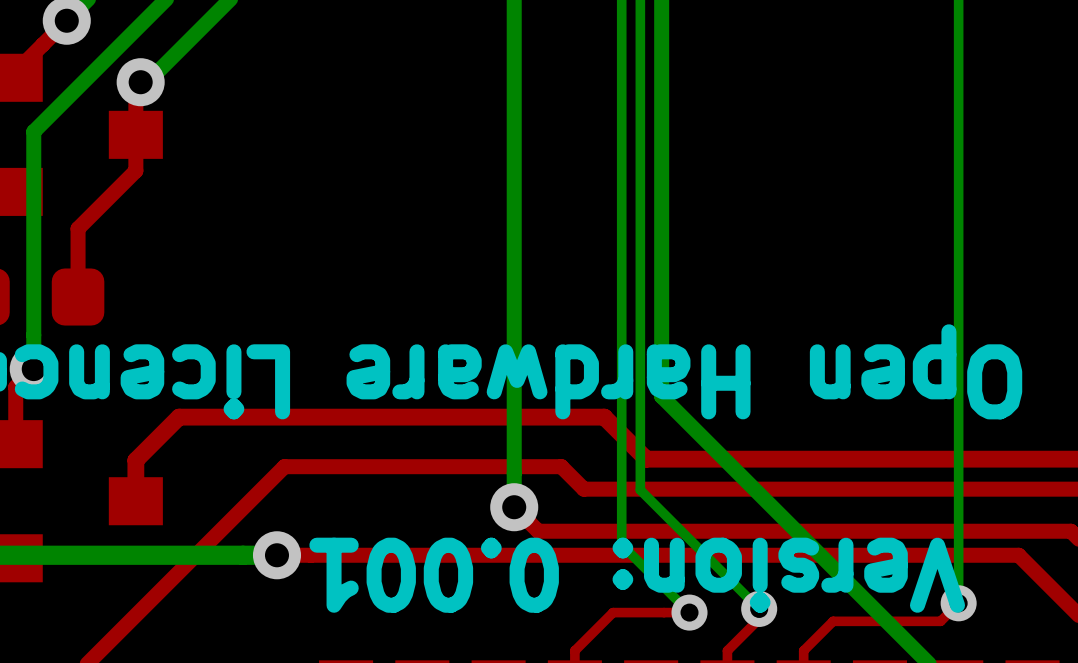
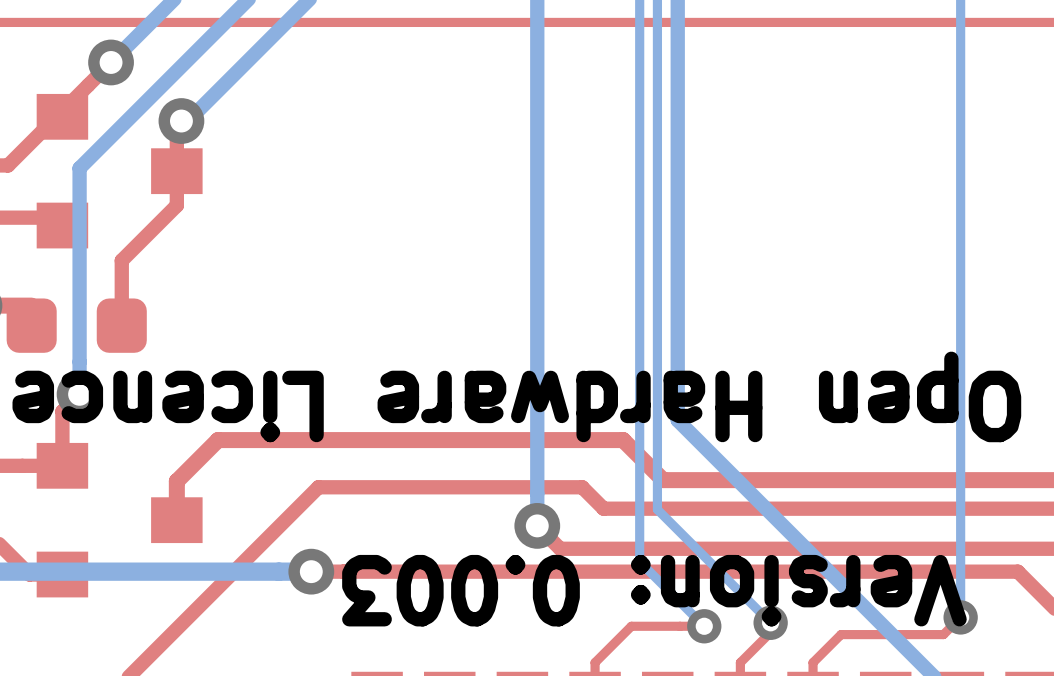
text: Version: 0.001 (637, 575) -> Version: 0.003 (654, 590)

